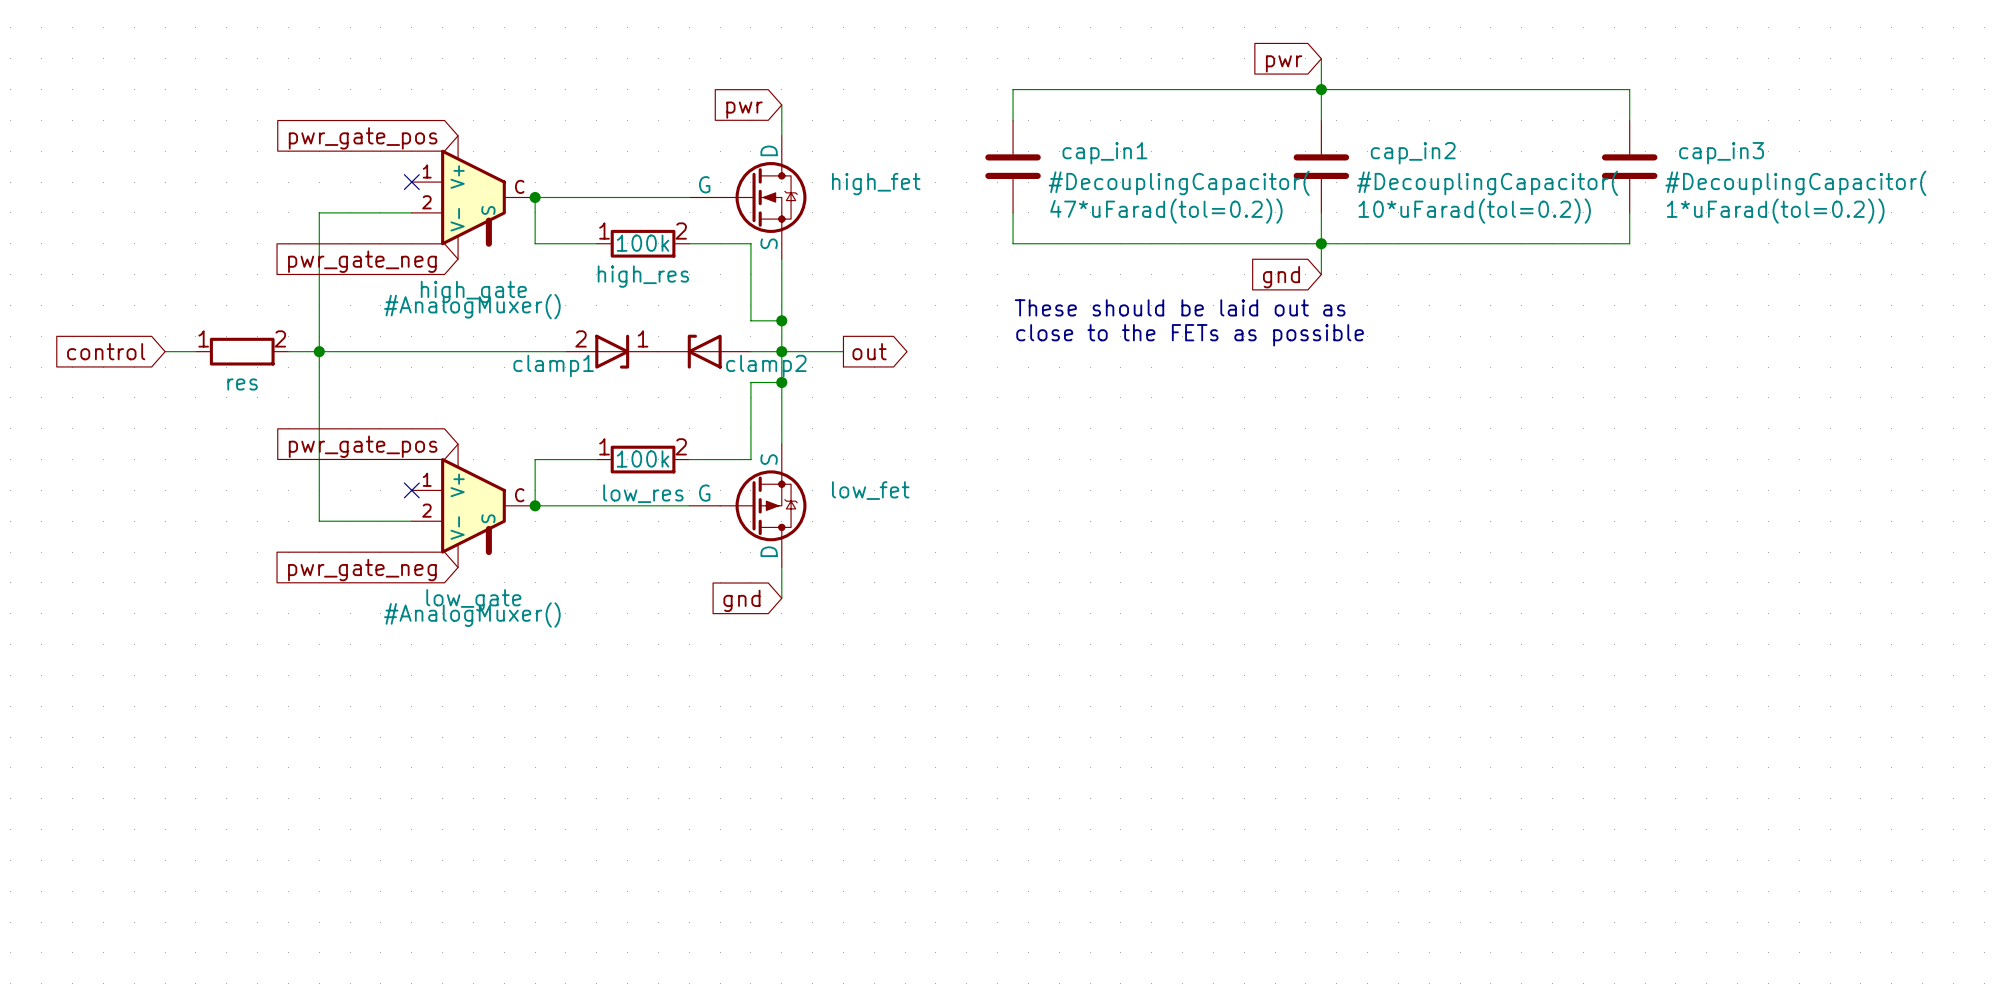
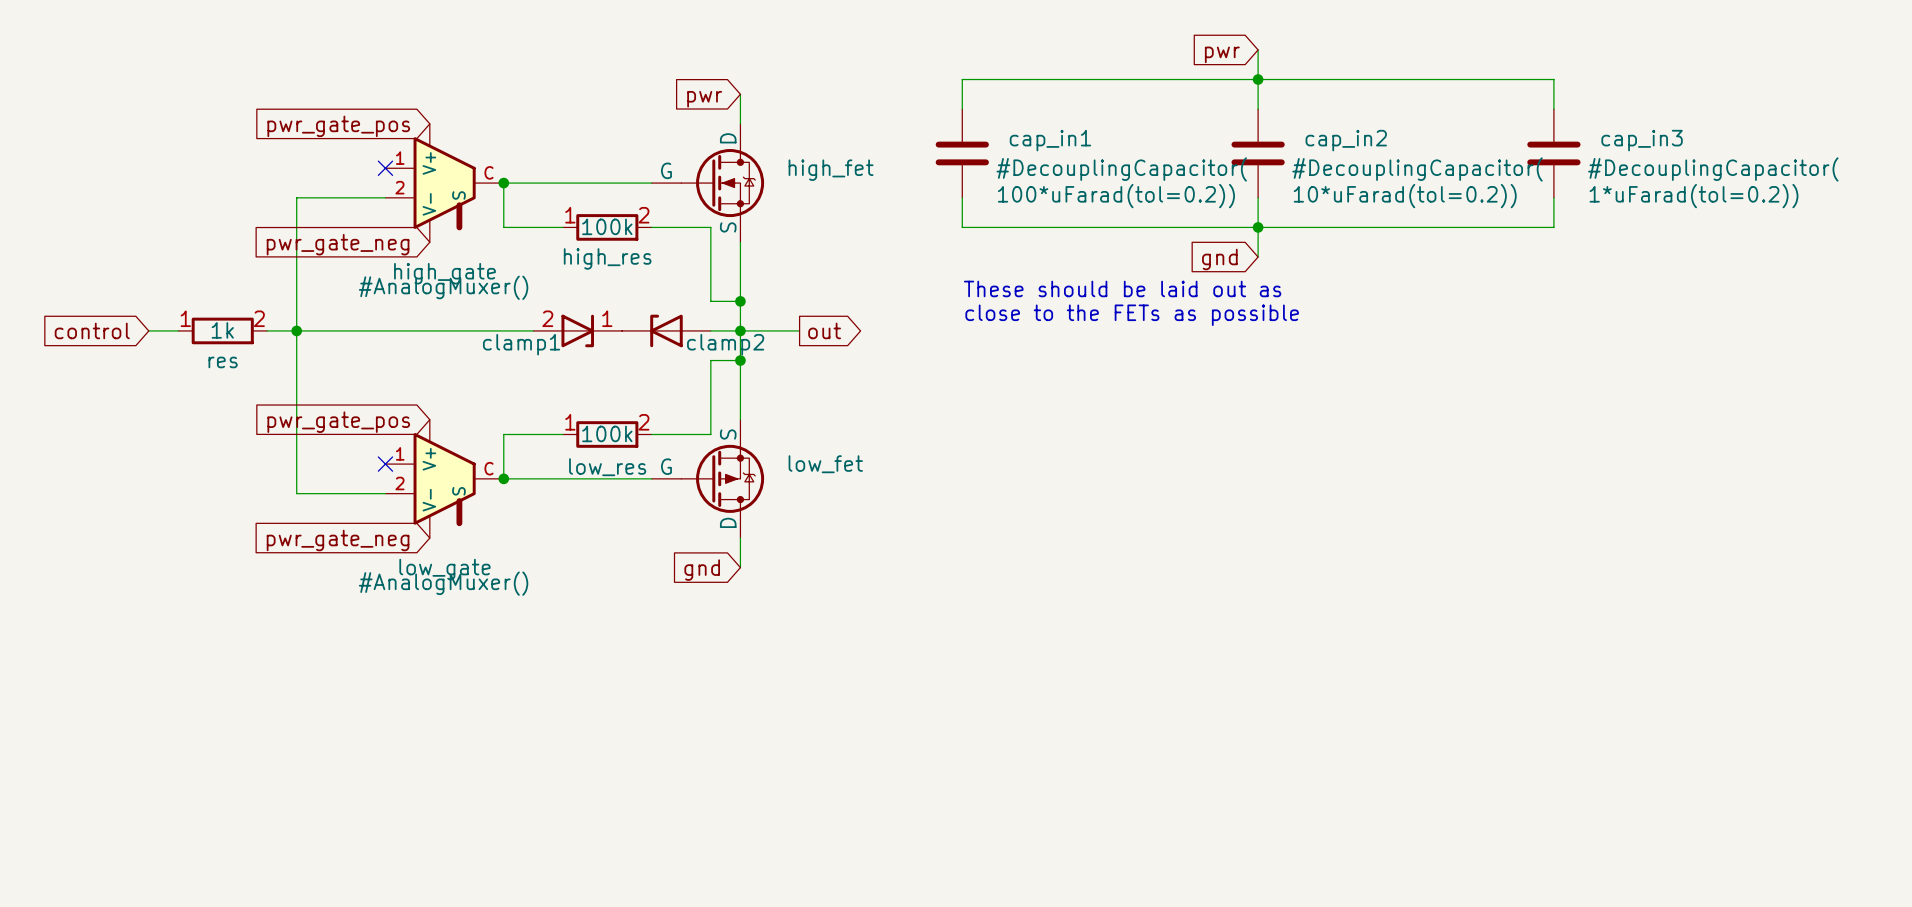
cap_in1 text: 47*uFarad(tol=0.2)) (1166, 211) -> 100*uFarad(tol=0.2)) (1116, 196)
res value: none -> 1k (222, 330)

